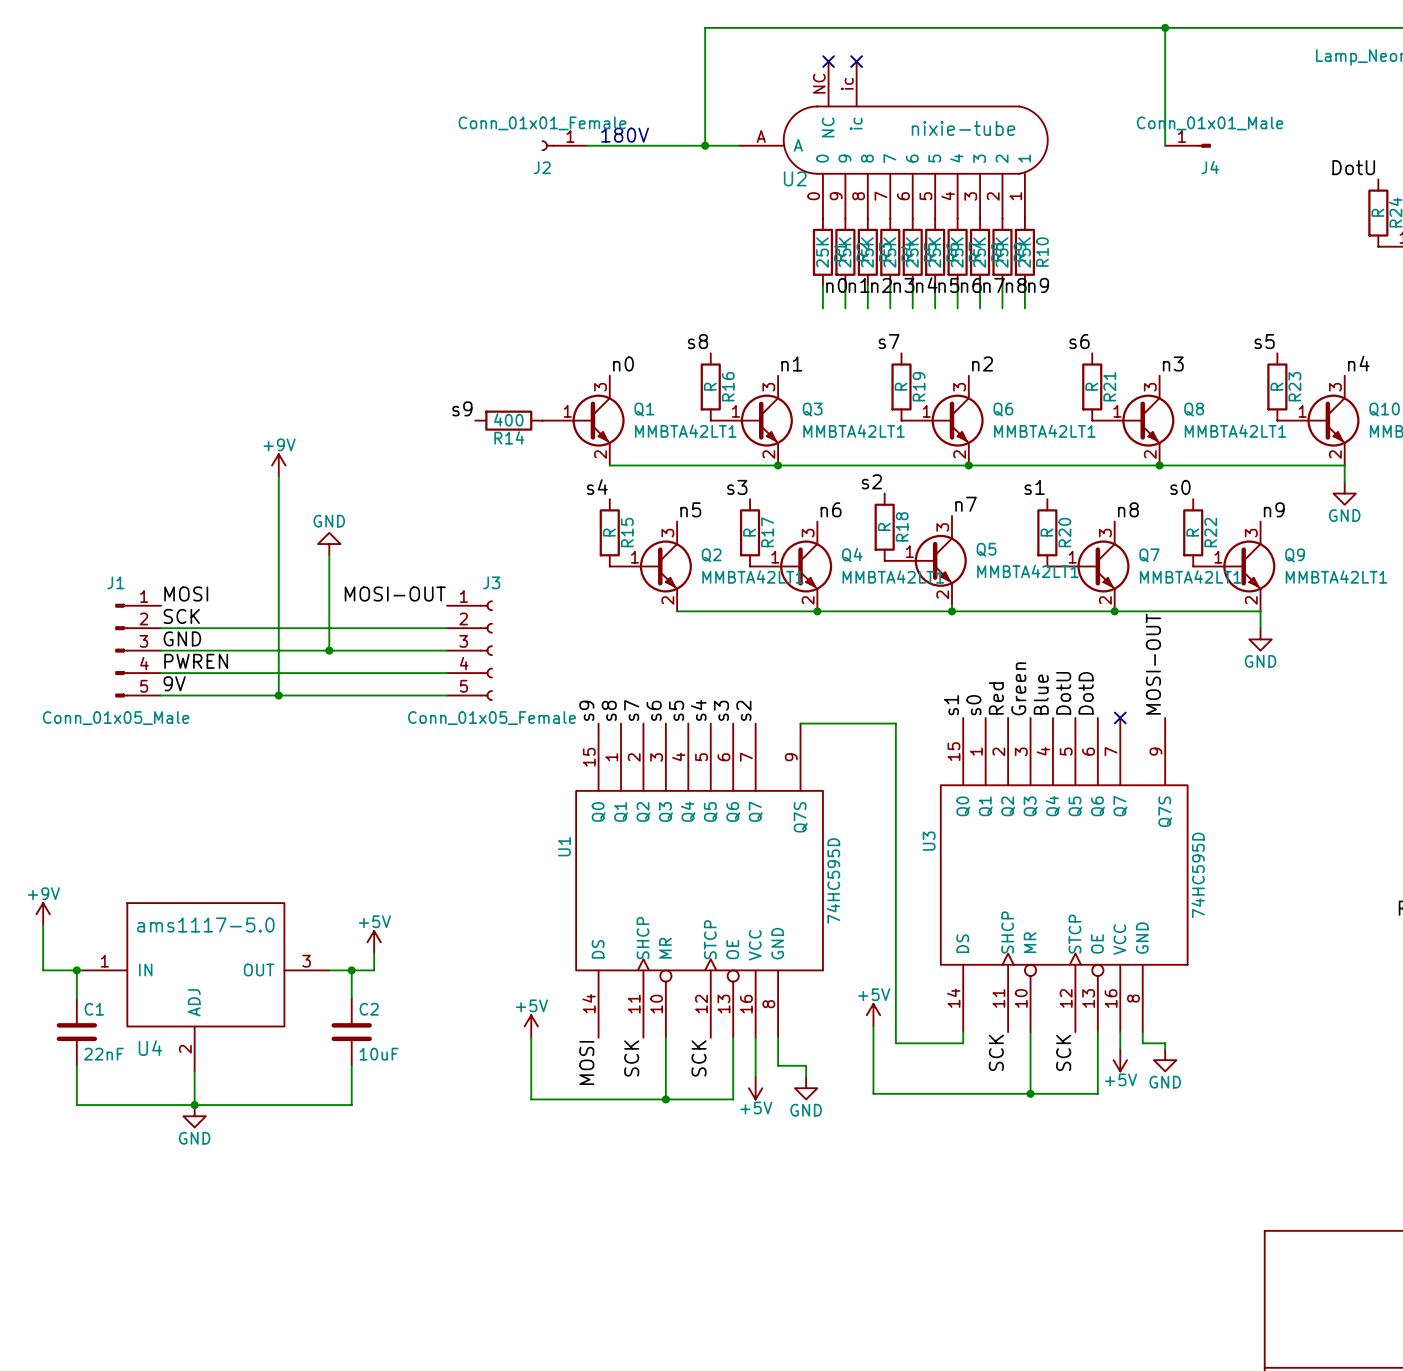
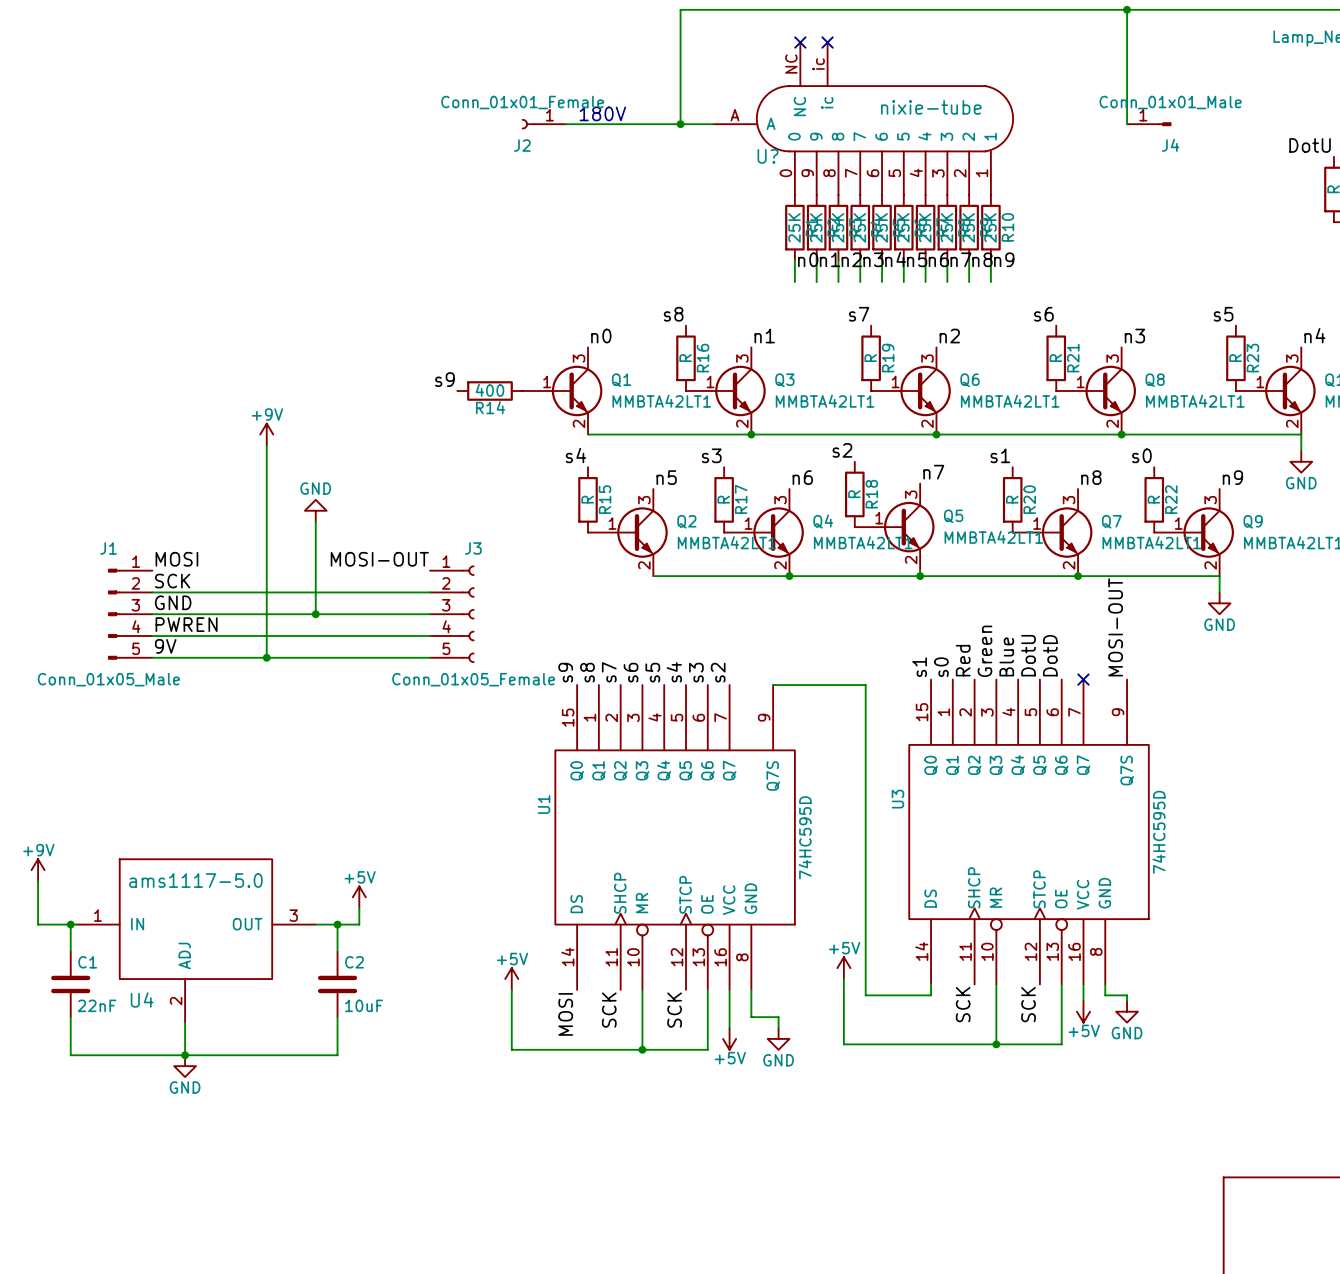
U2 name: U2 (795, 178) -> U? (767, 156)

